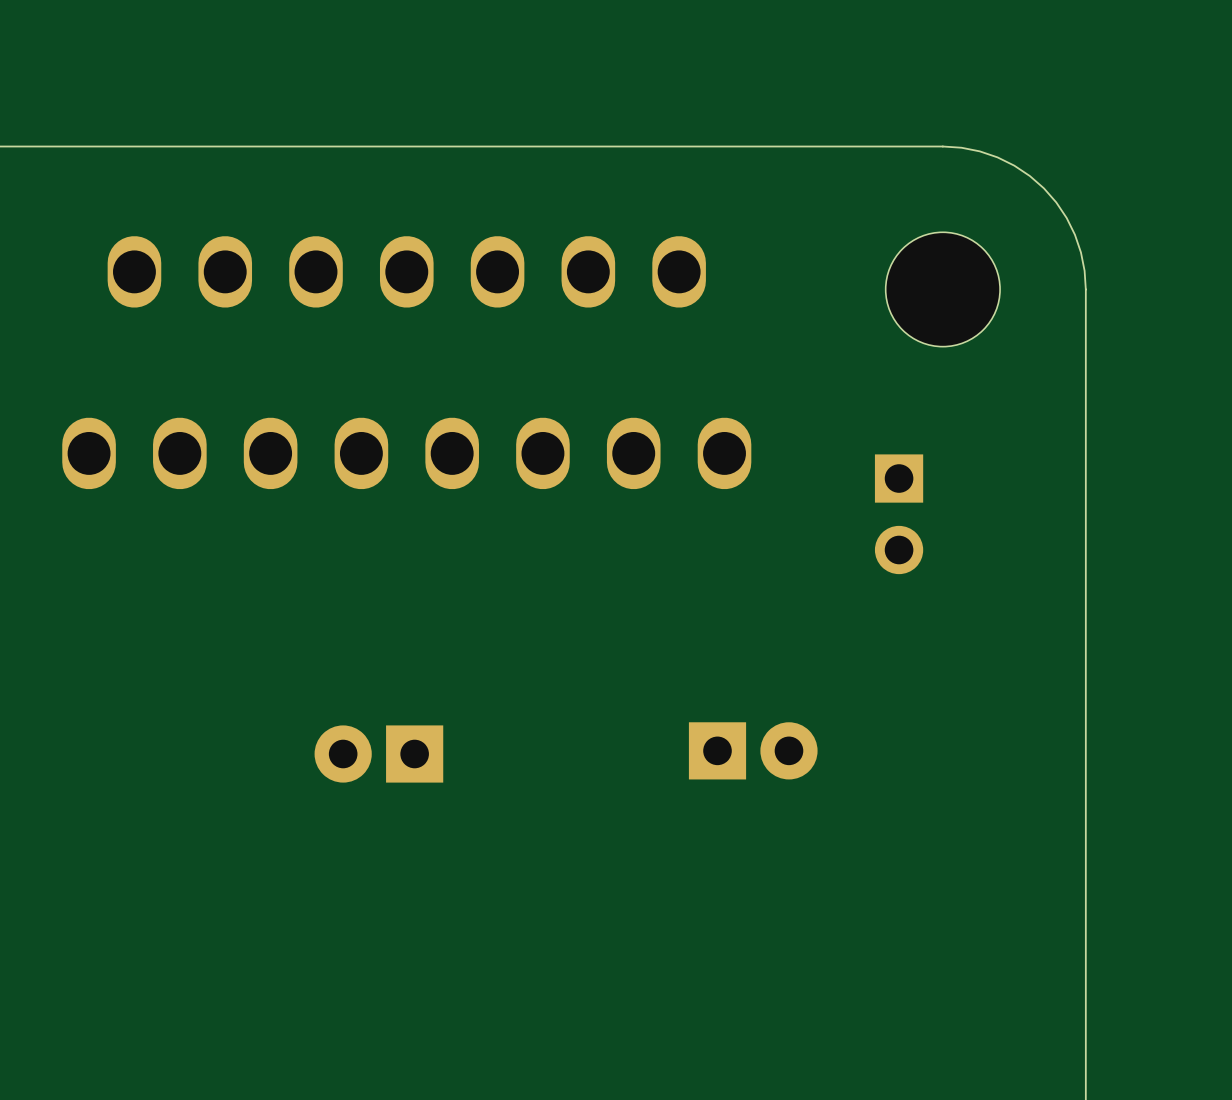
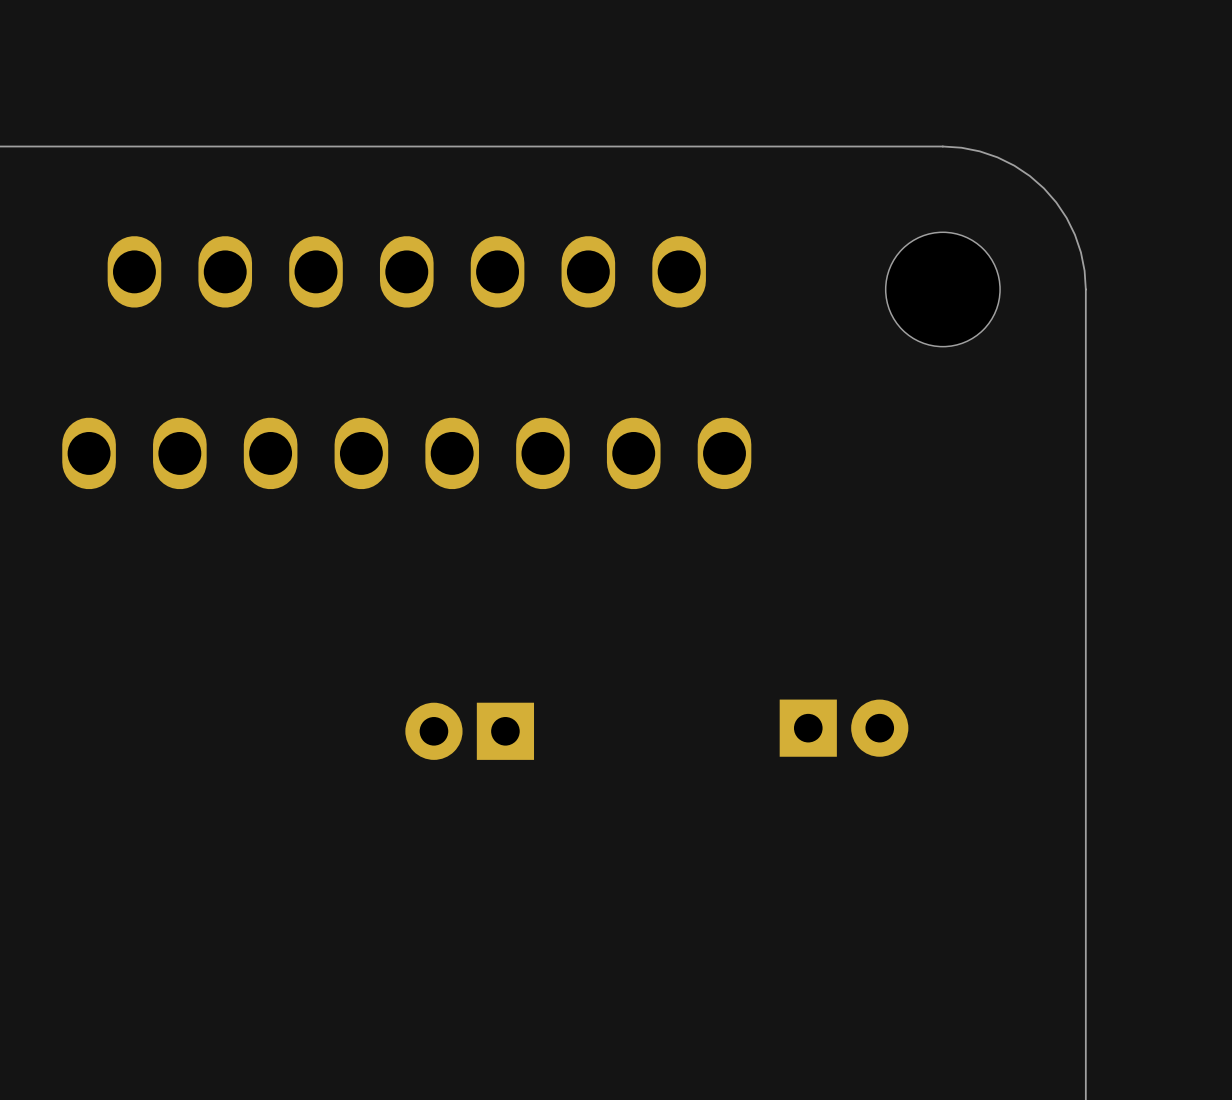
part: (899, 514) -> none
part position: (753, 750) -> (844, 728)
part position: (378, 754) -> (469, 731)

